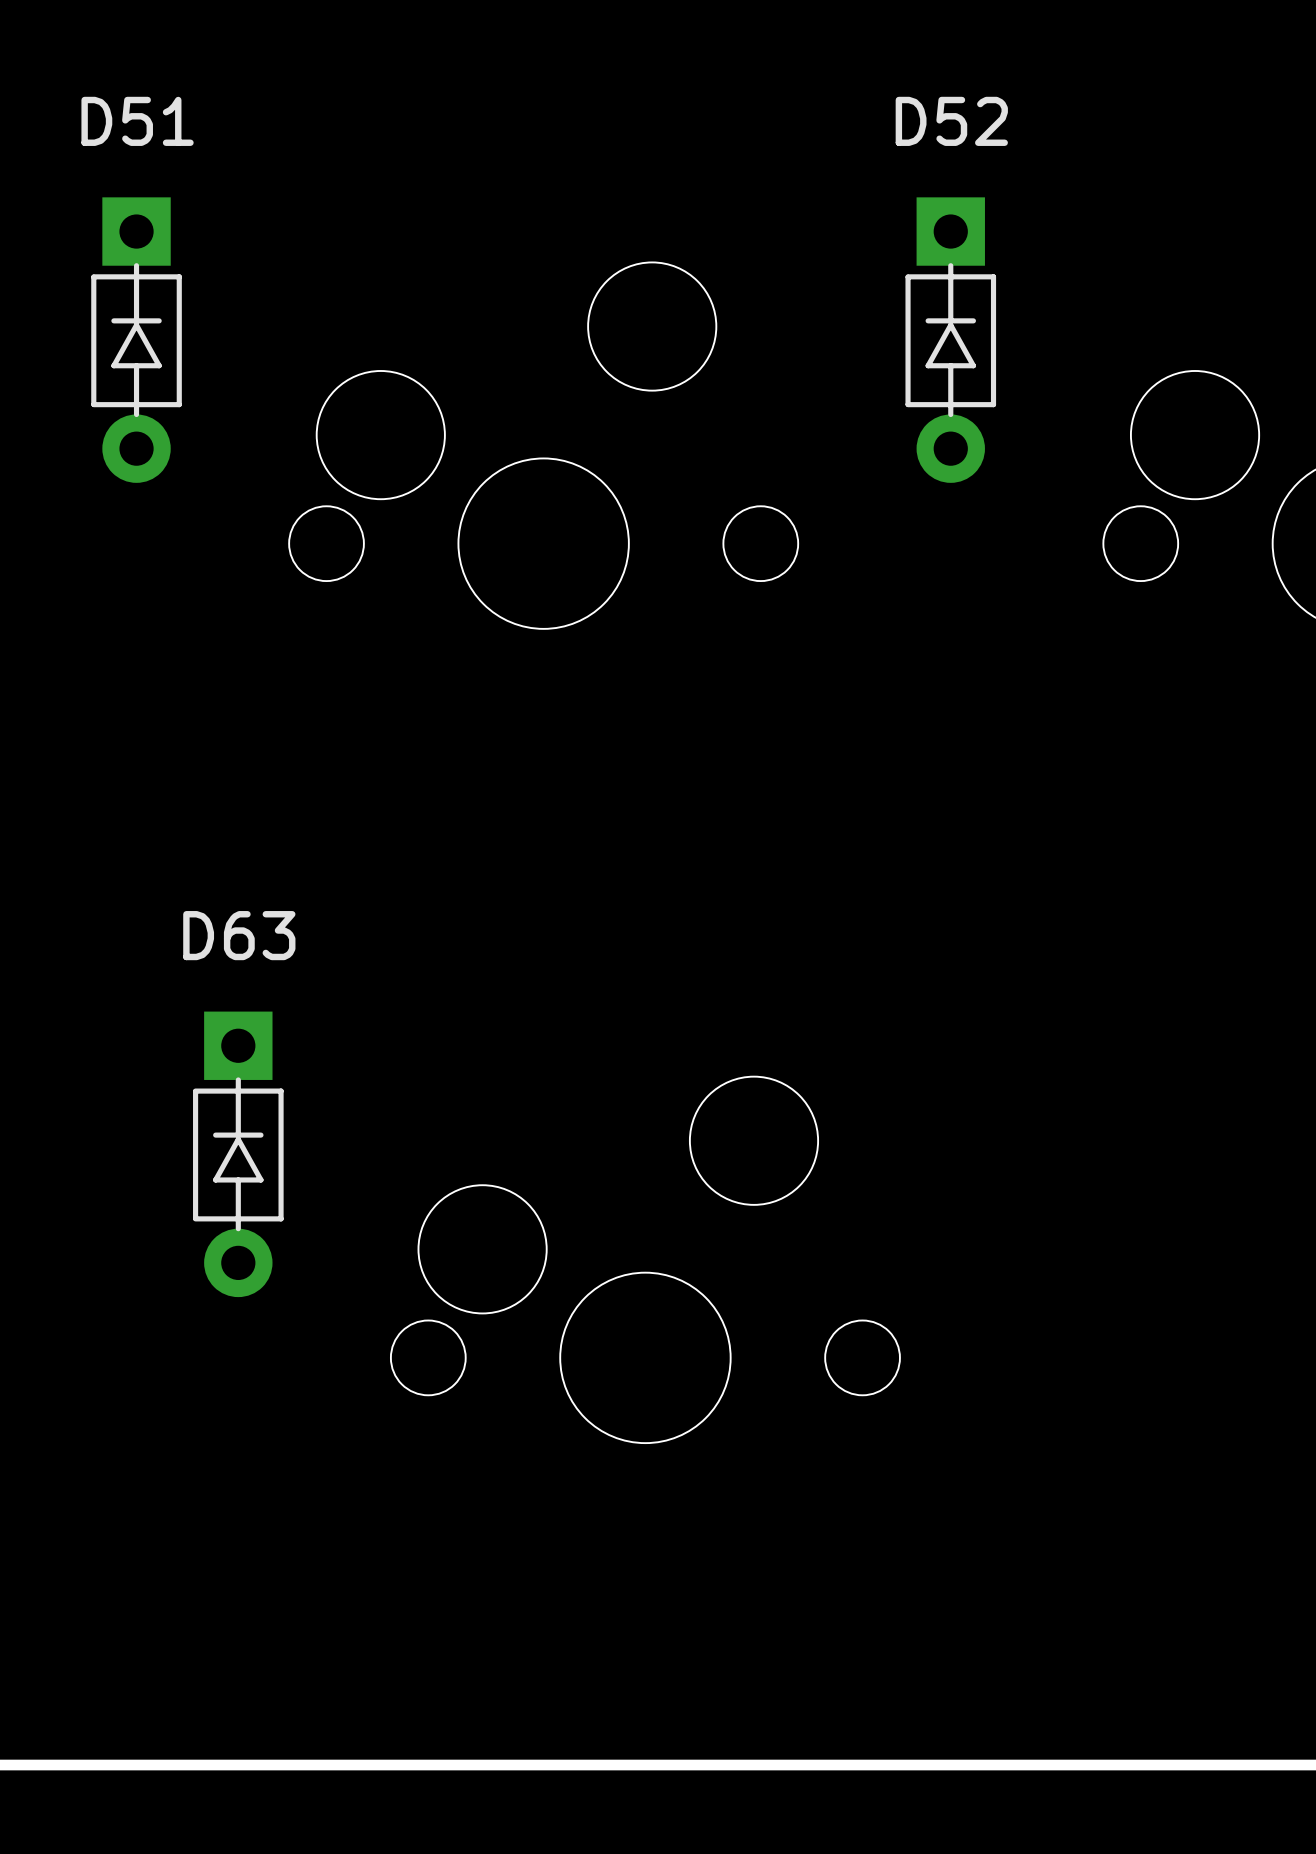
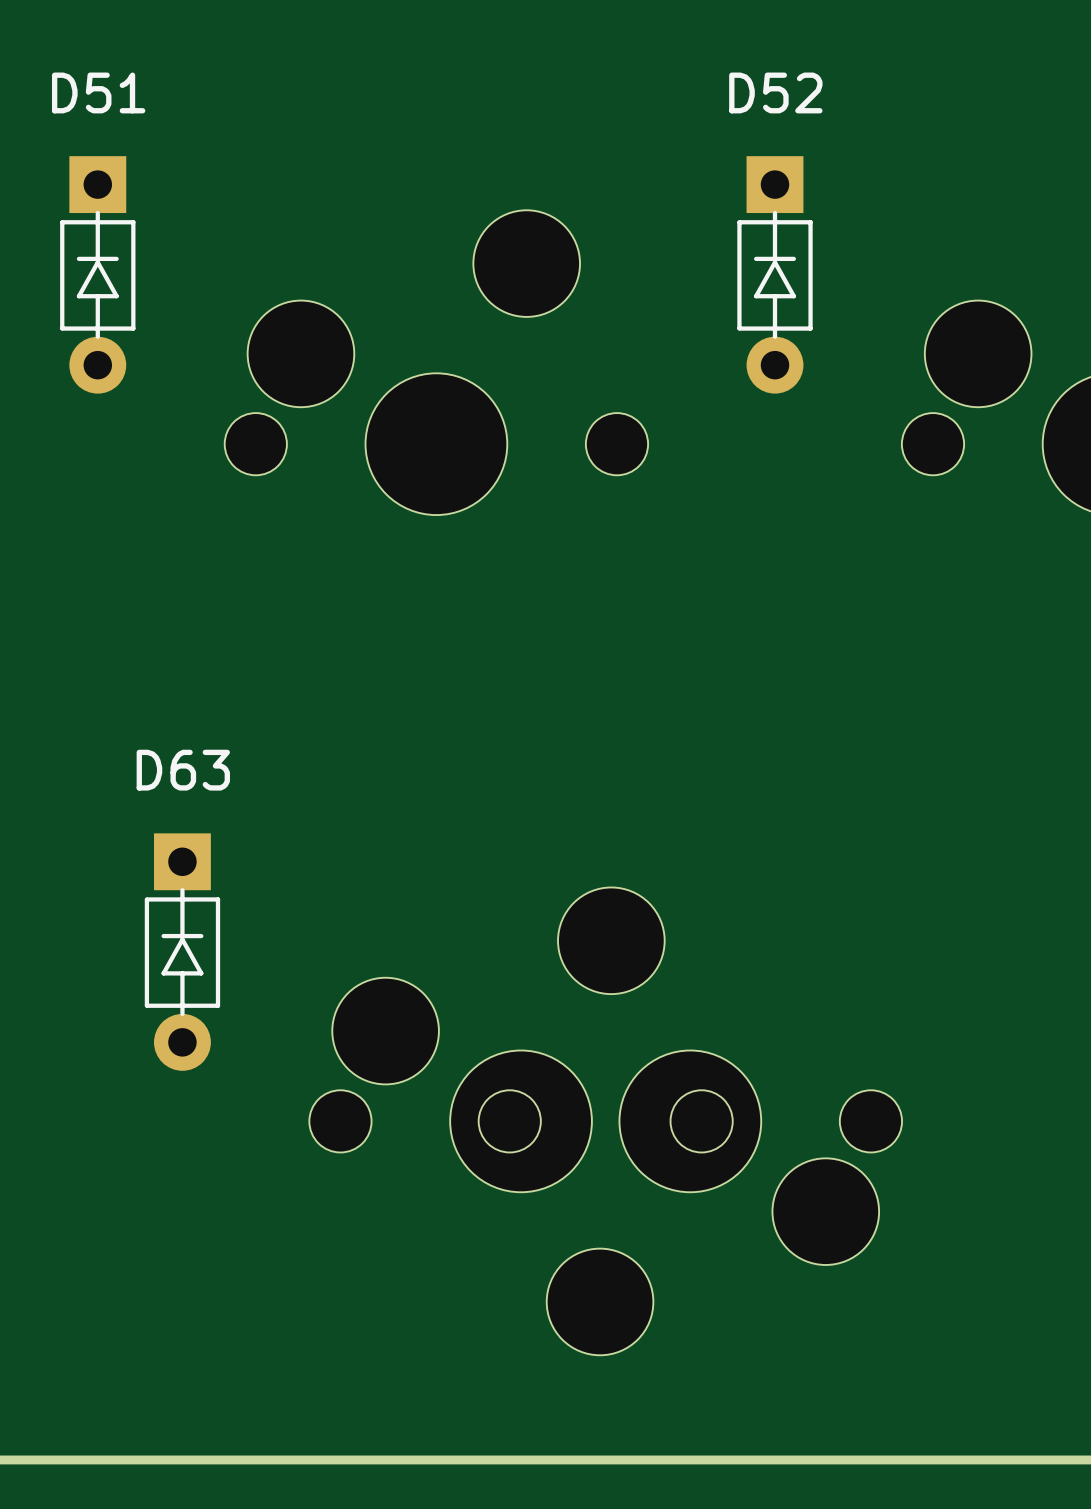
part: none -> (690, 1202)

